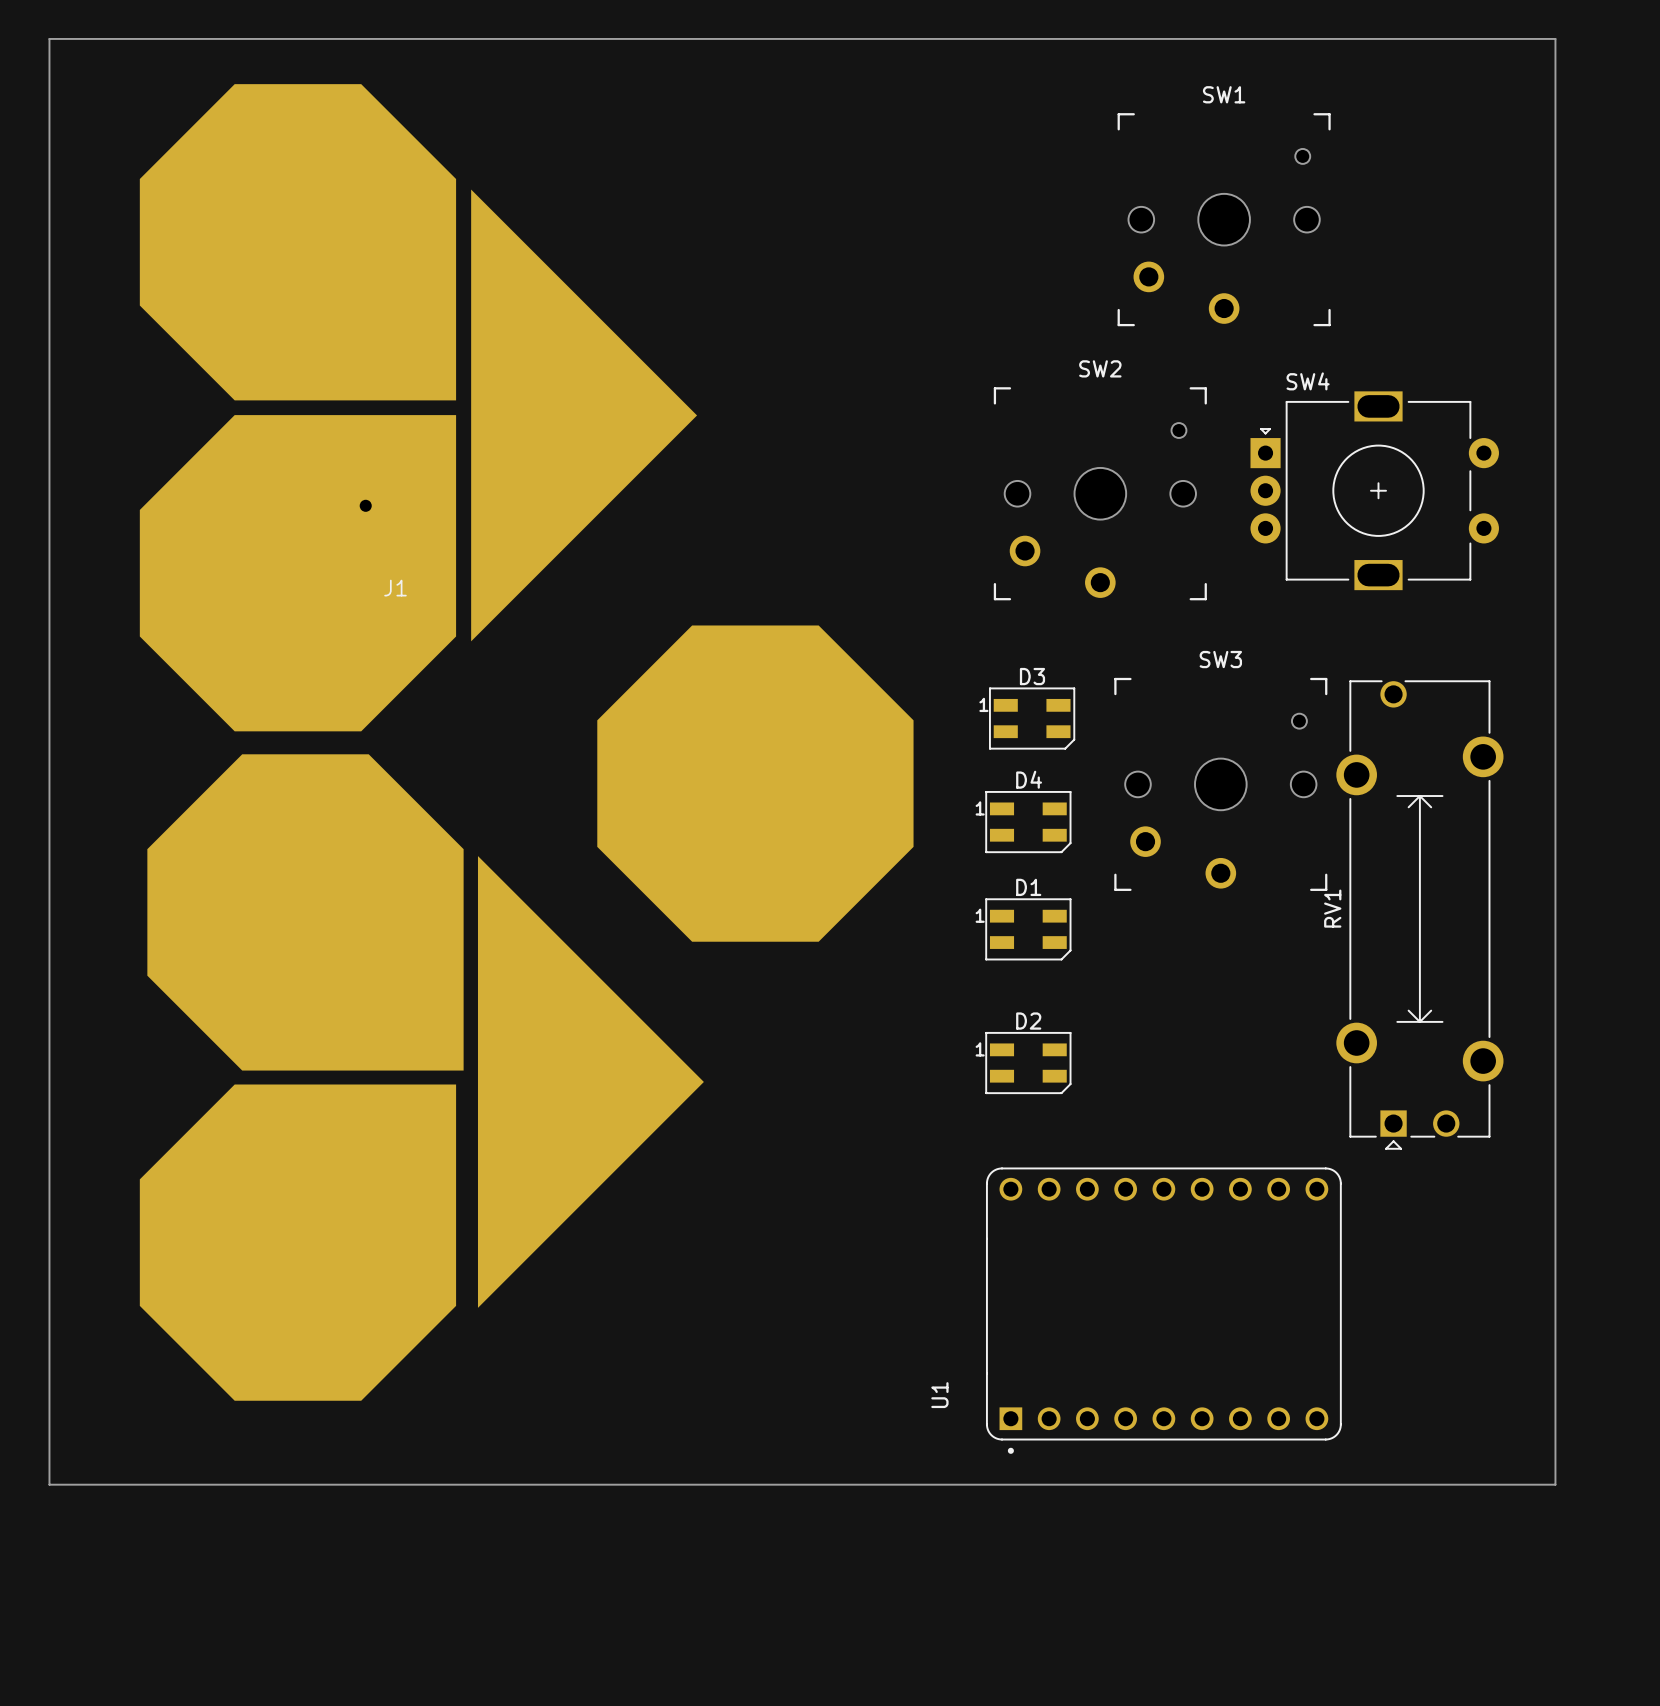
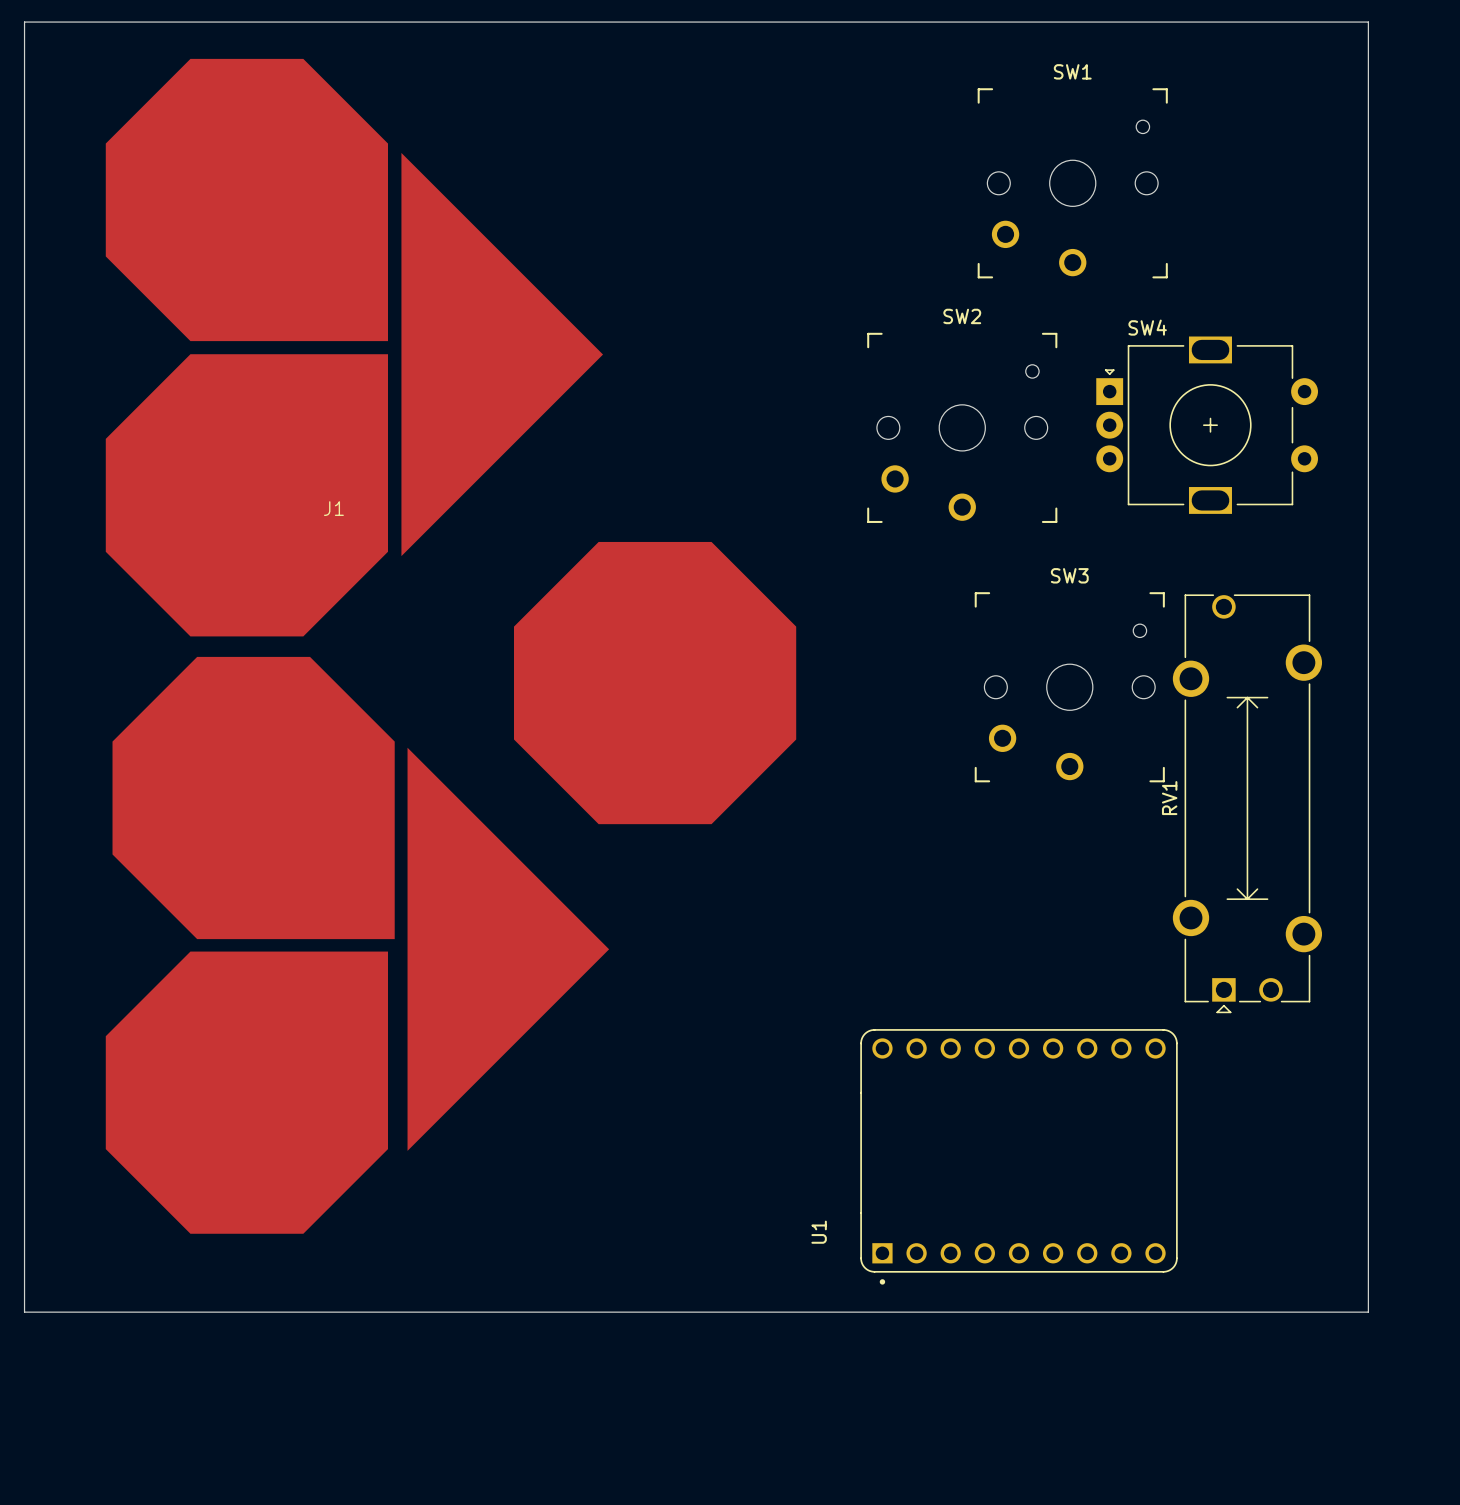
J1 footprint: [139, 84, 914, 1401] -> [105, 58, 797, 1234]
D3: (1032, 718) -> none
D4: (1028, 822) -> none
D1: (1028, 929) -> none
D2: (1028, 1063) -> none

